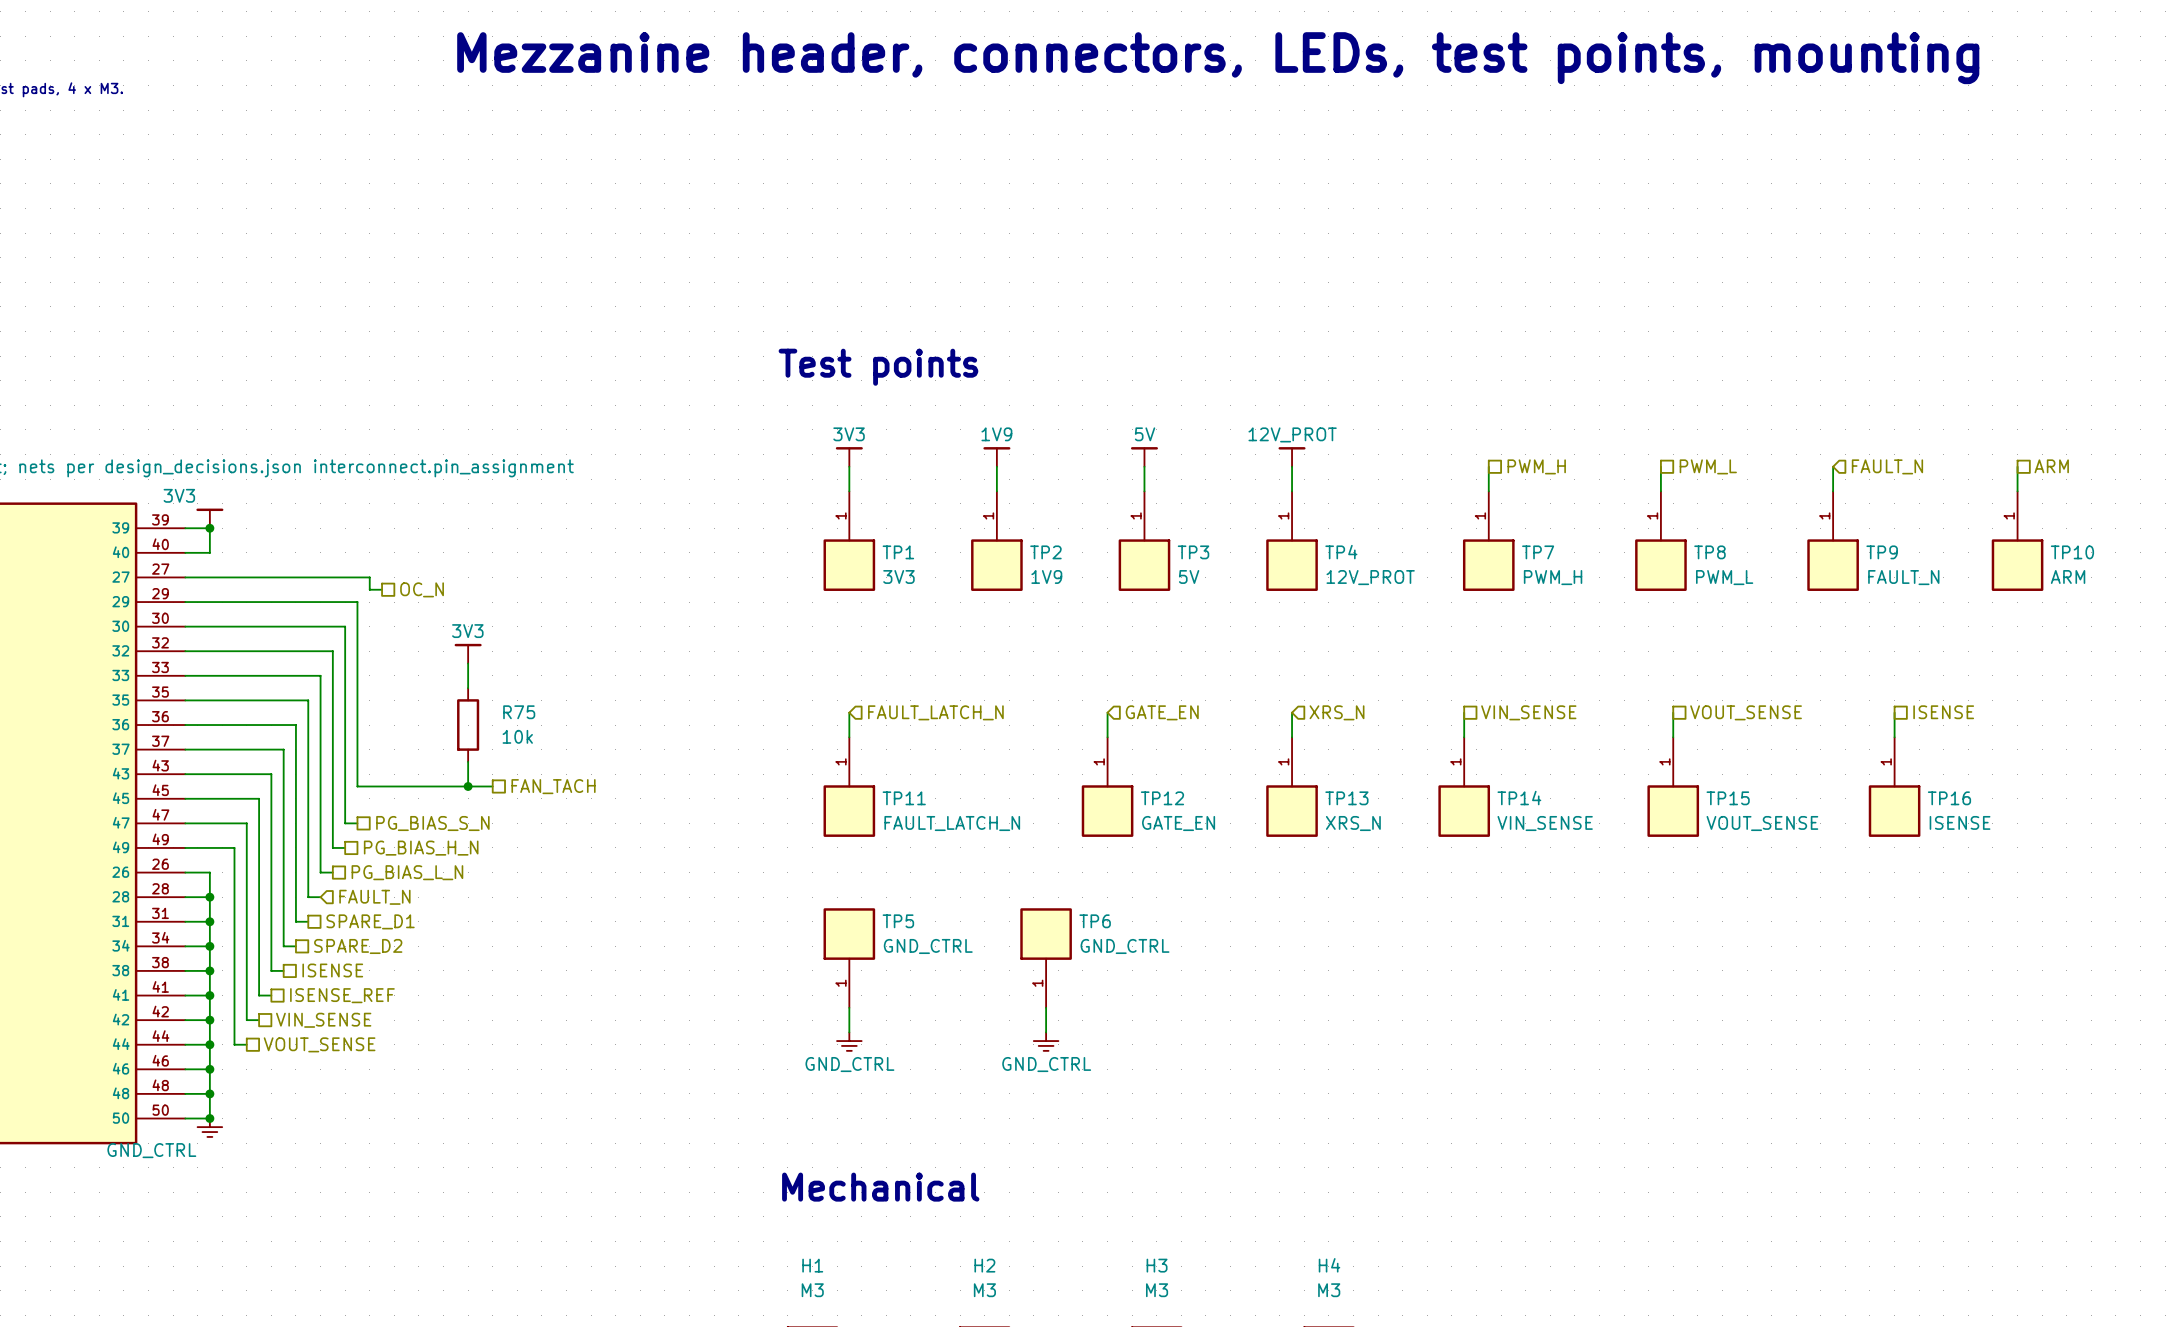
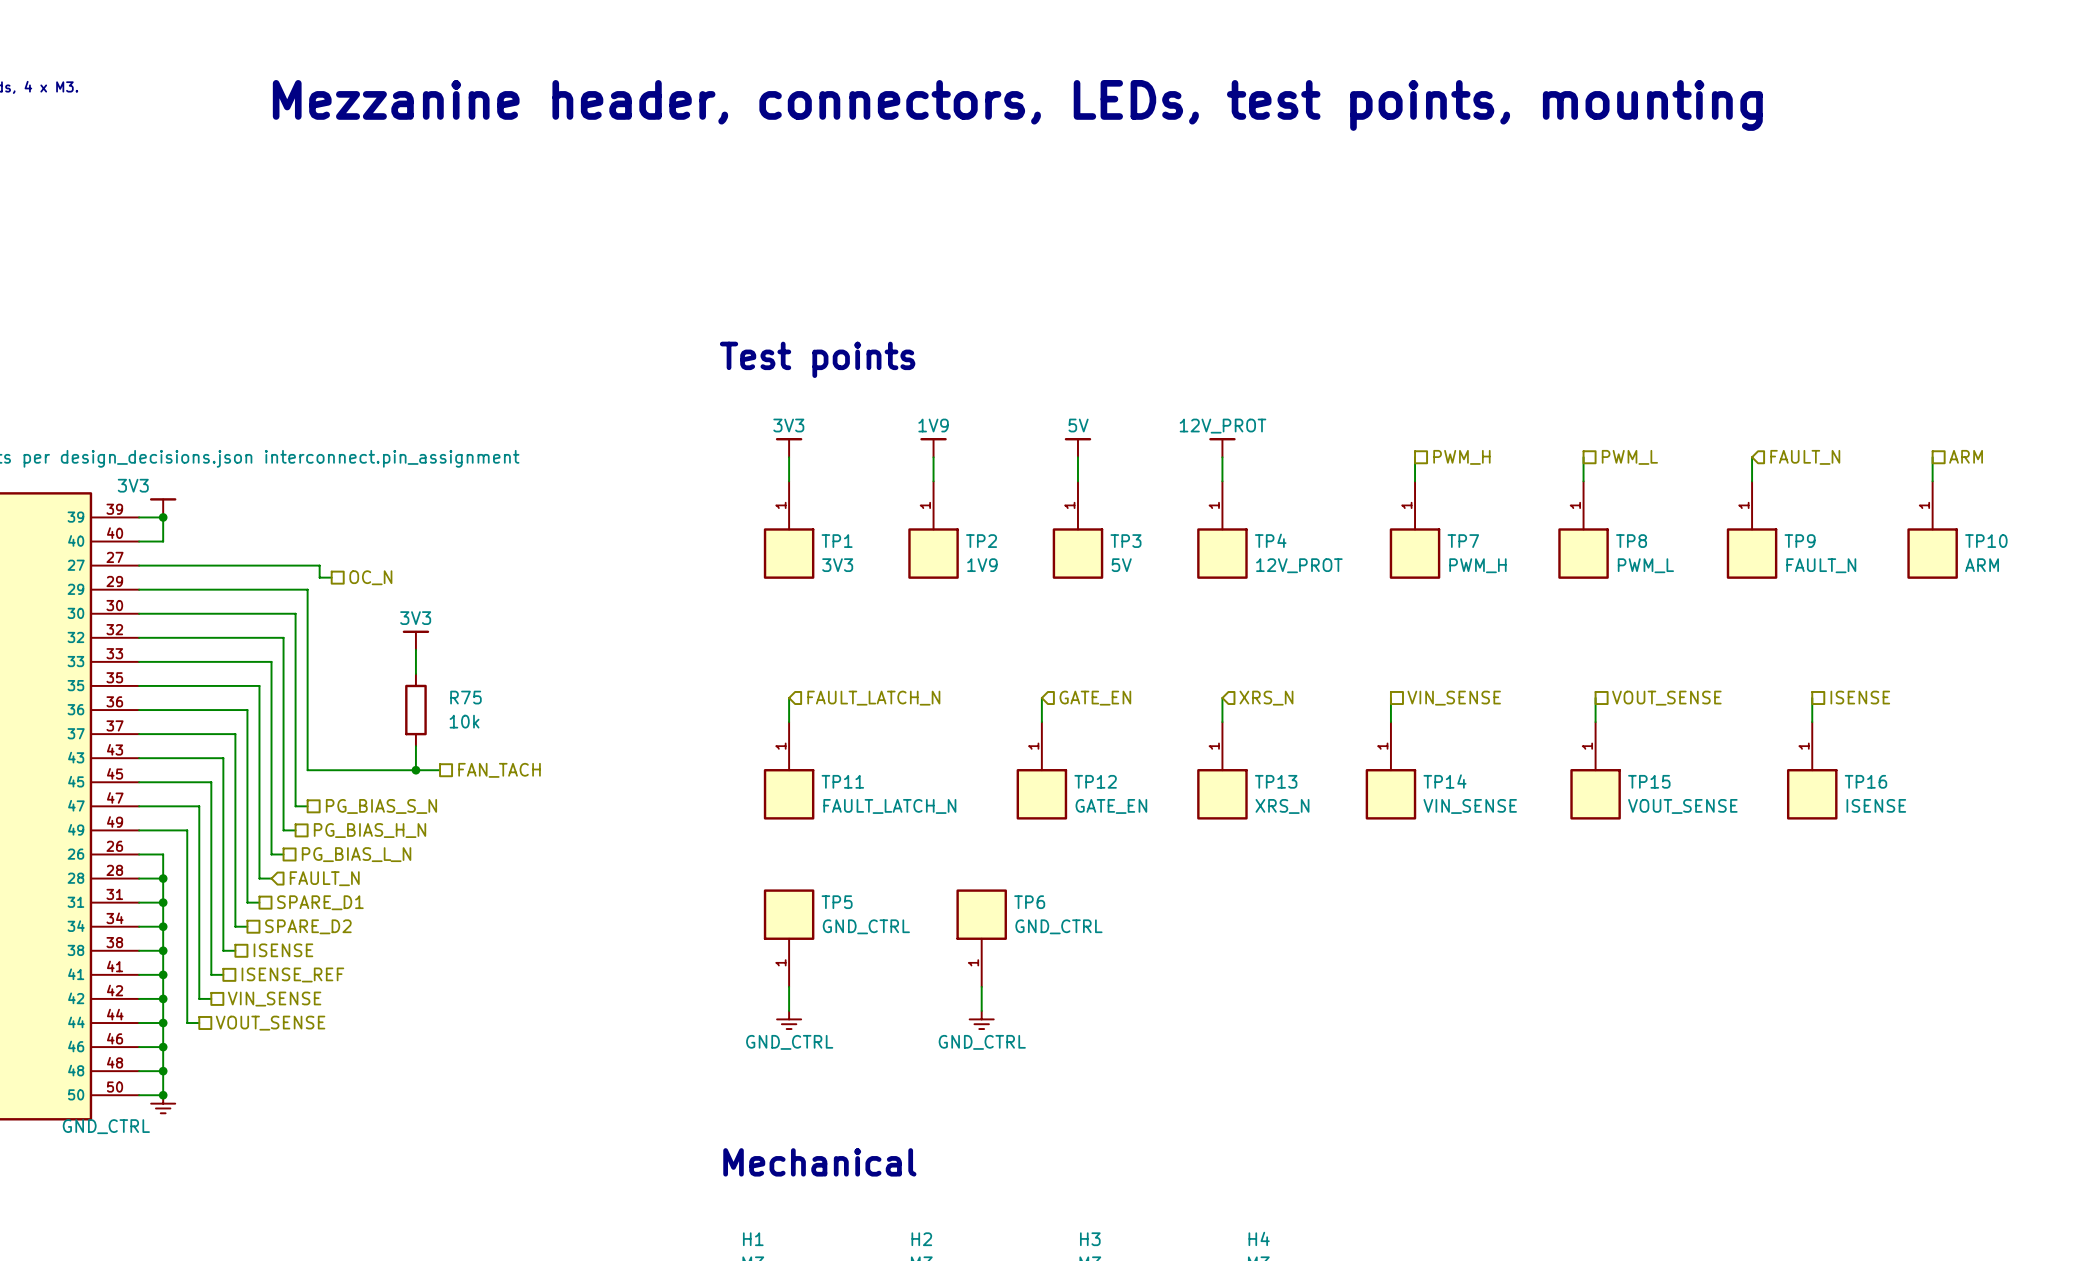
text position: Mezzanine header, connectors, LEDs, test points, mounting (1218, 58) -> Mezzanine header, connectors, LEDs, test points, mounting (1017, 105)

